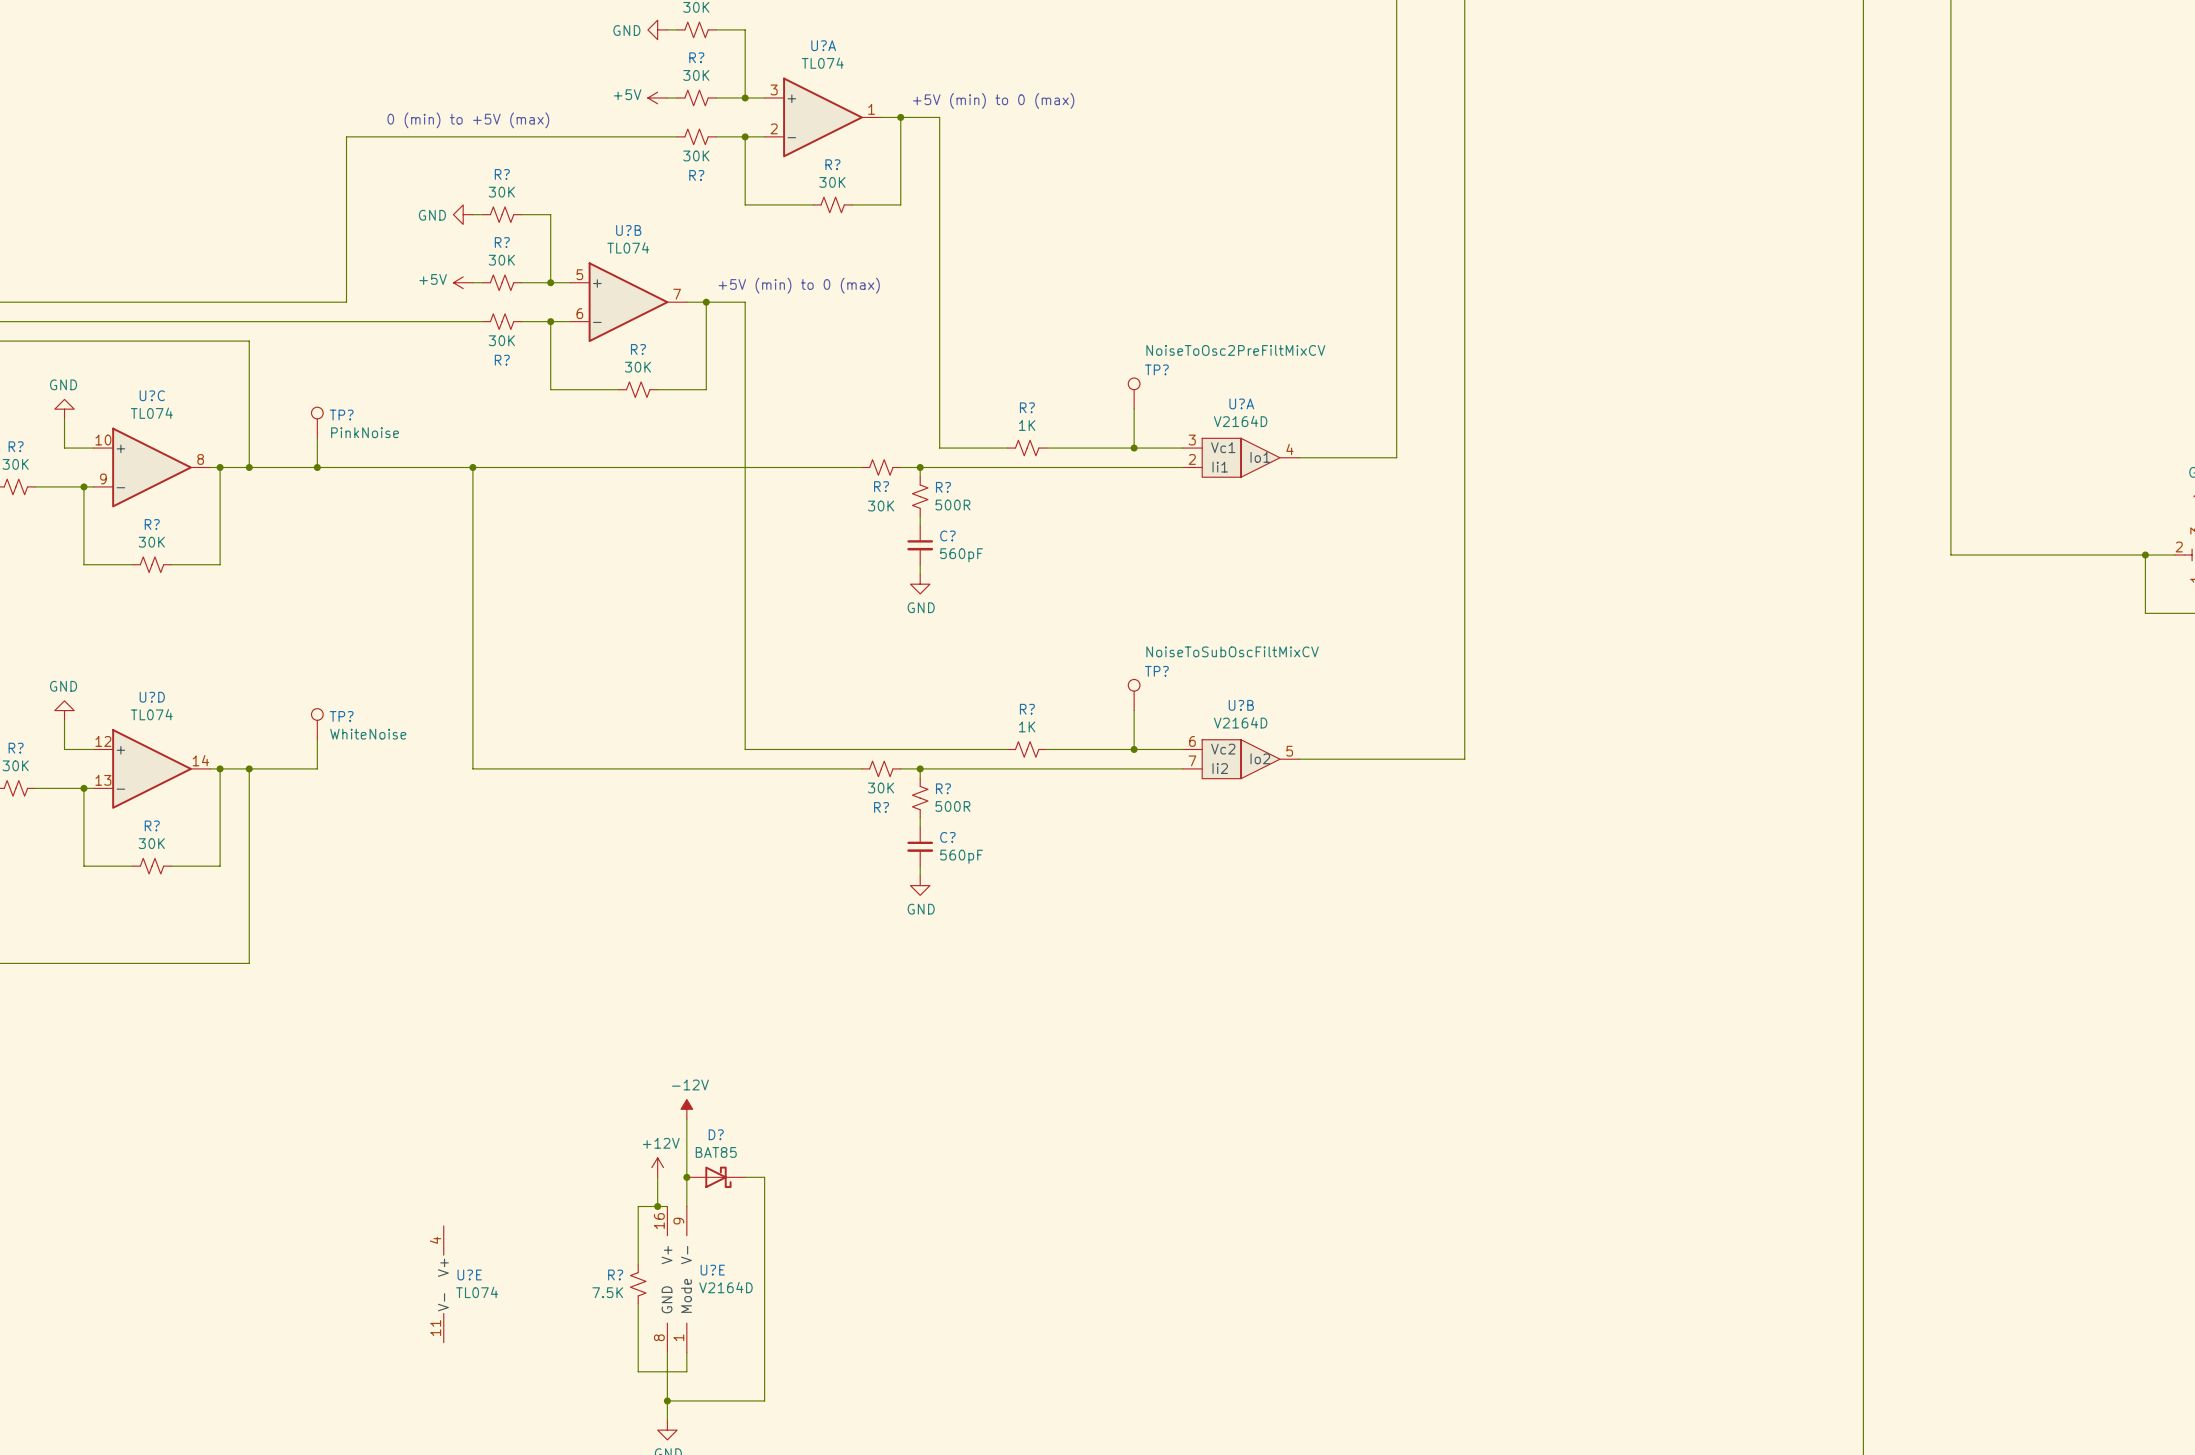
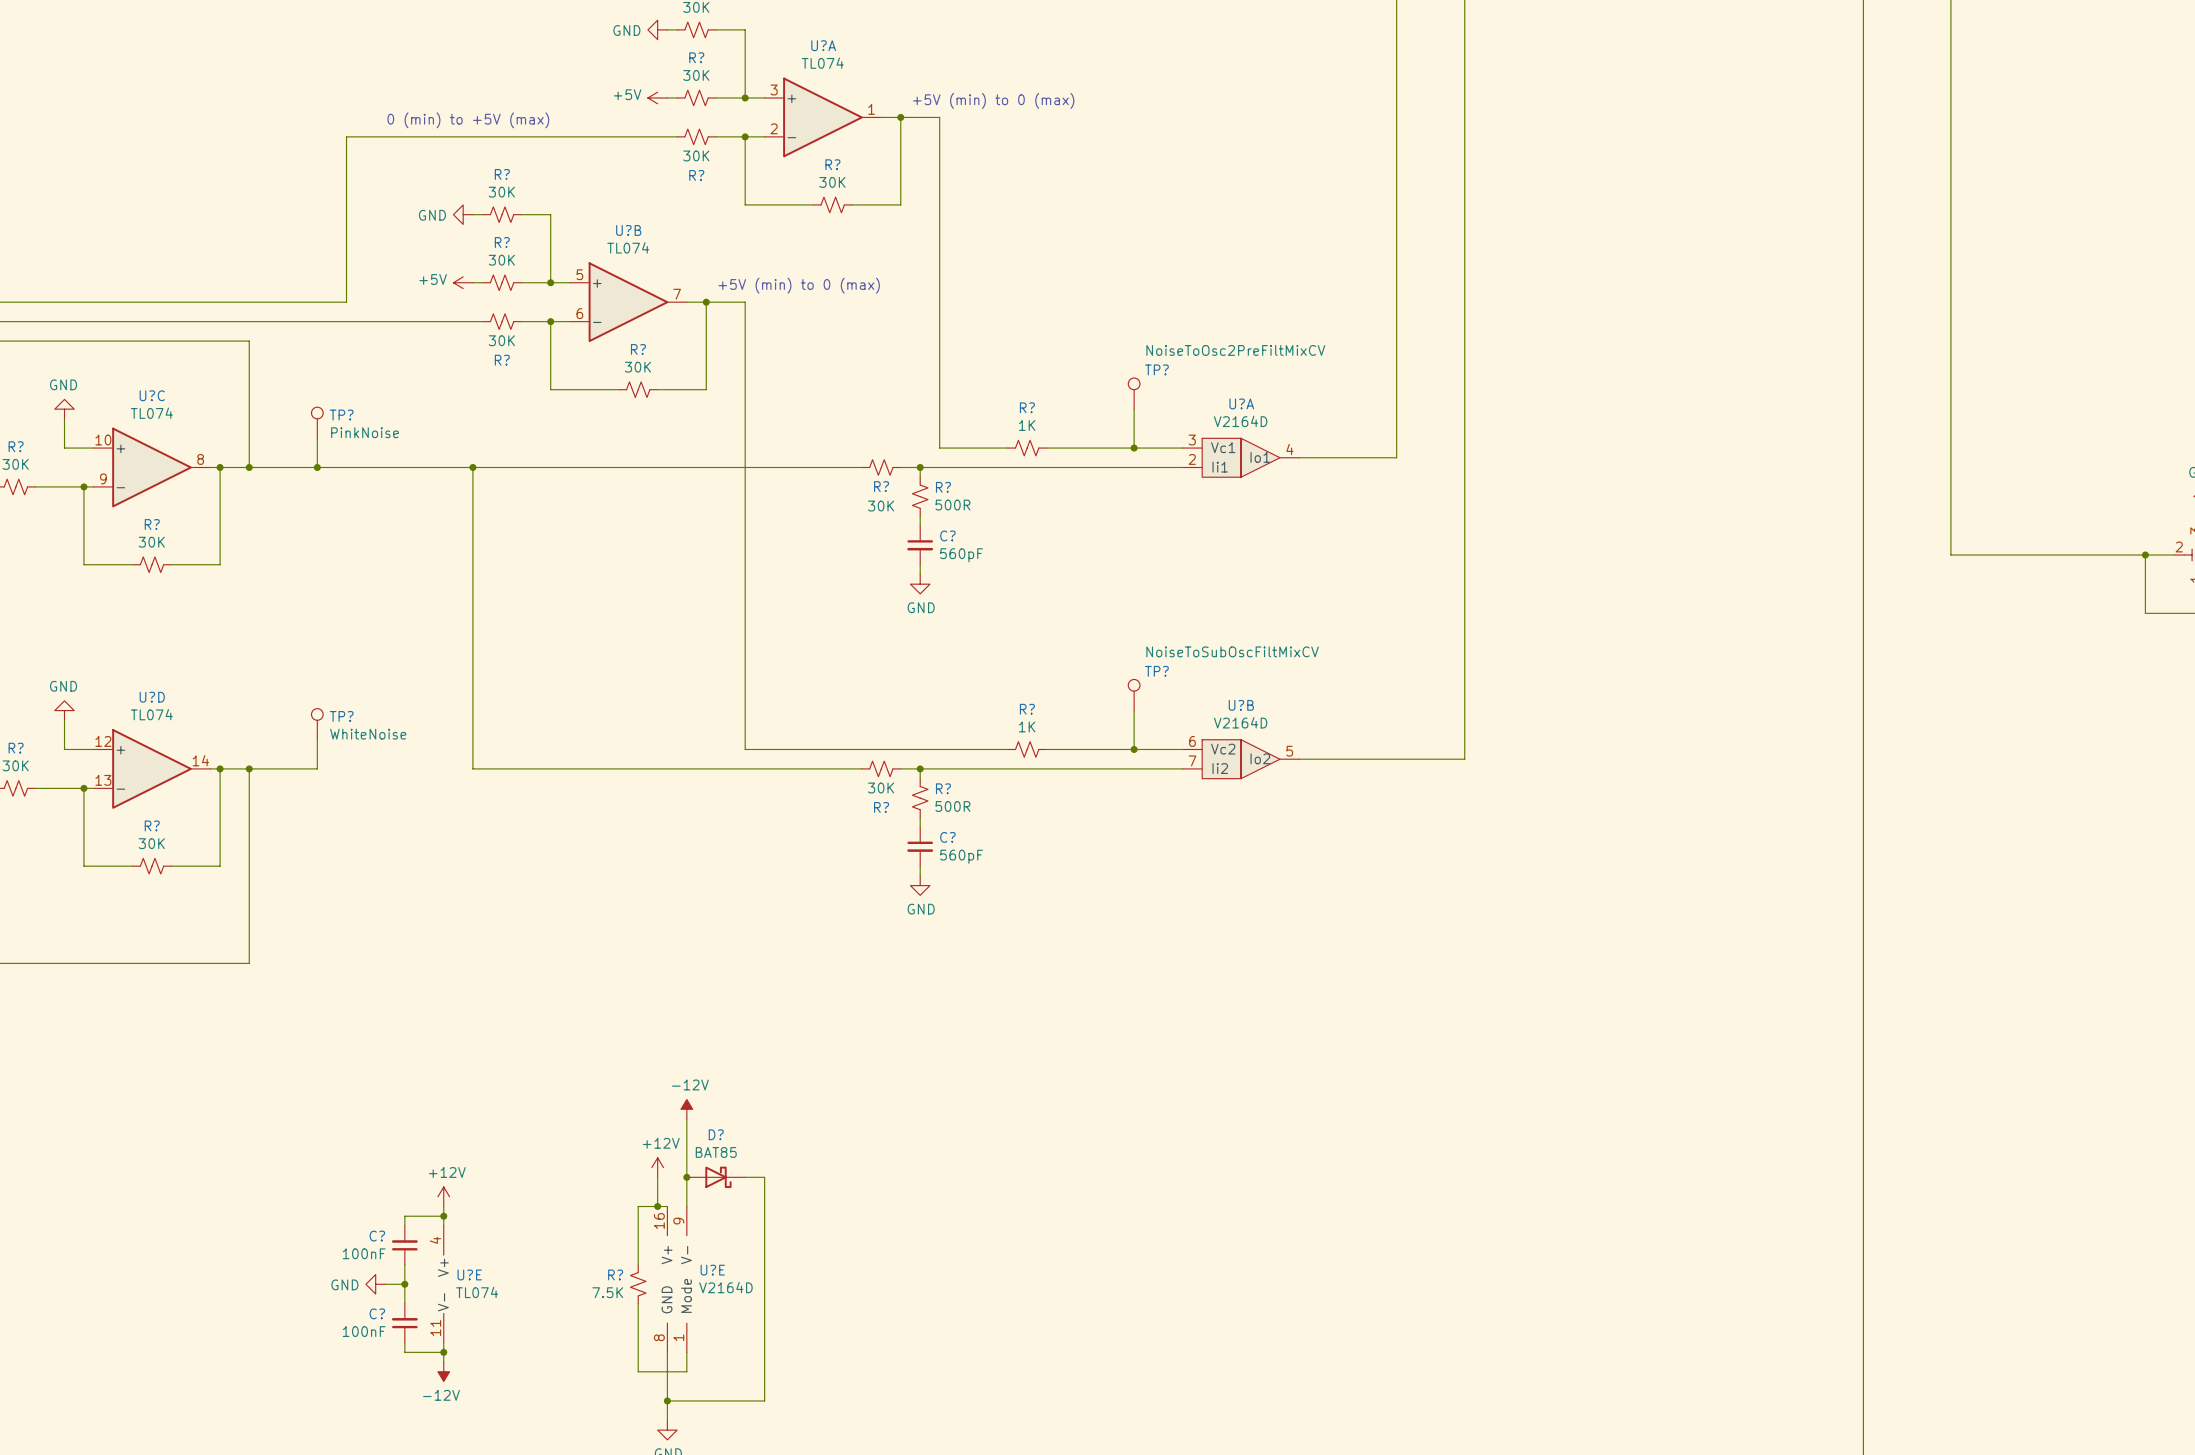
power symbol: none -> +12V (443, 1196)
wire: none -> (443, 1206) (443, 1225)
wire: none -> (443, 1216) (404, 1216) (404, 1225)
junction: none -> (443, 1216)
C?: none -> 100nF (404, 1245)
wire: none -> (404, 1264) (404, 1303)
power symbol: none -> GND (375, 1284)
wire: none -> (385, 1284) (404, 1284)
junction: none -> (404, 1284)
C?: none -> 100nF (404, 1323)
wire: none -> (404, 1342) (404, 1352) (443, 1352)
wire: none -> (443, 1342) (443, 1362)
junction: none -> (443, 1352)
power symbol: none -> -12V (443, 1371)

